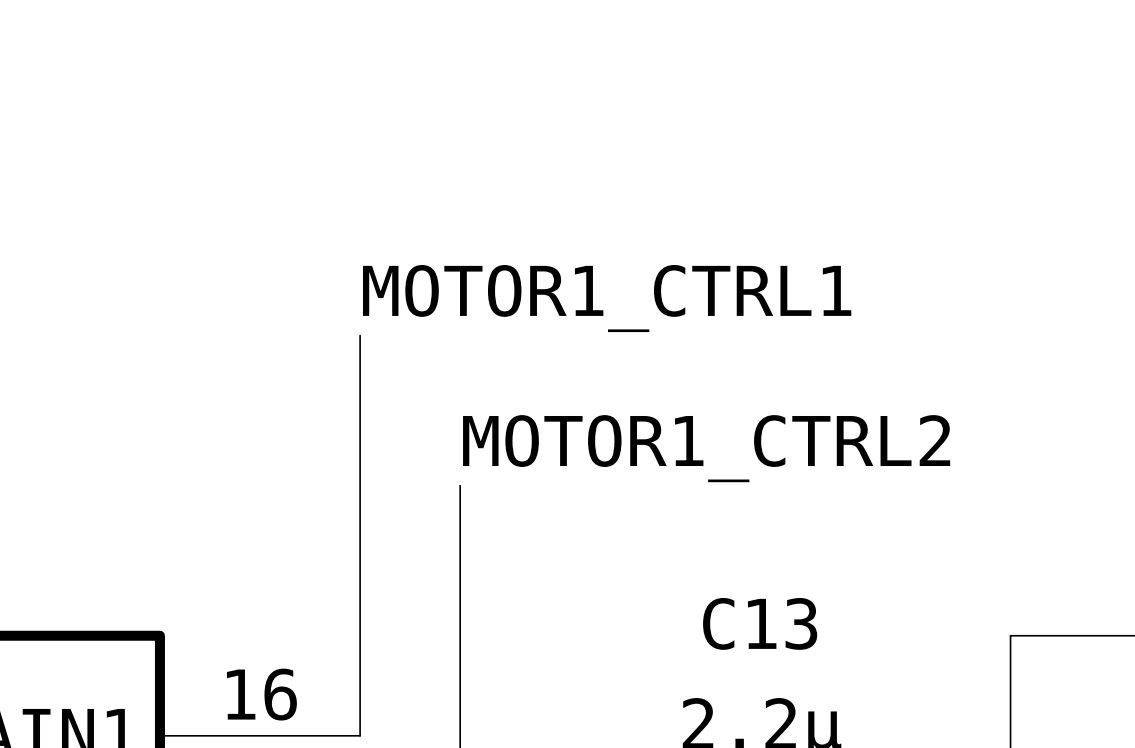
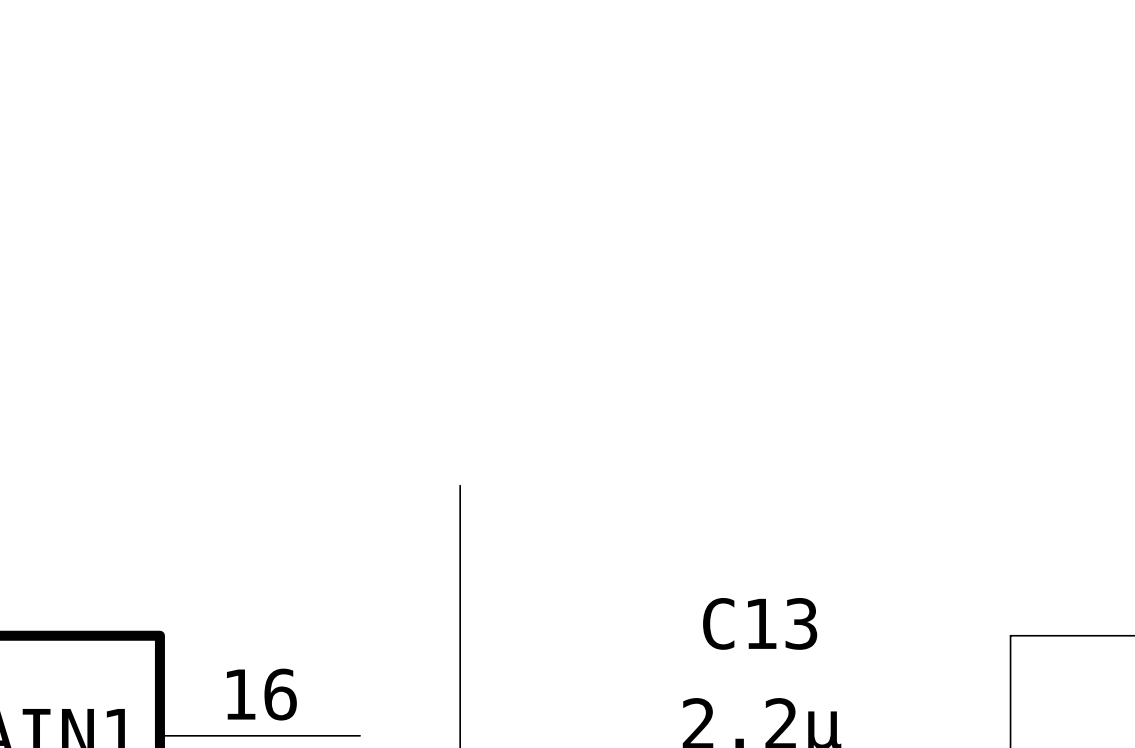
label: MOTOR1_CTRL1 (607, 298) -> none
wire: (360, 335) (360, 735) -> none
label: MOTOR1_CTRL2 (706, 448) -> none

